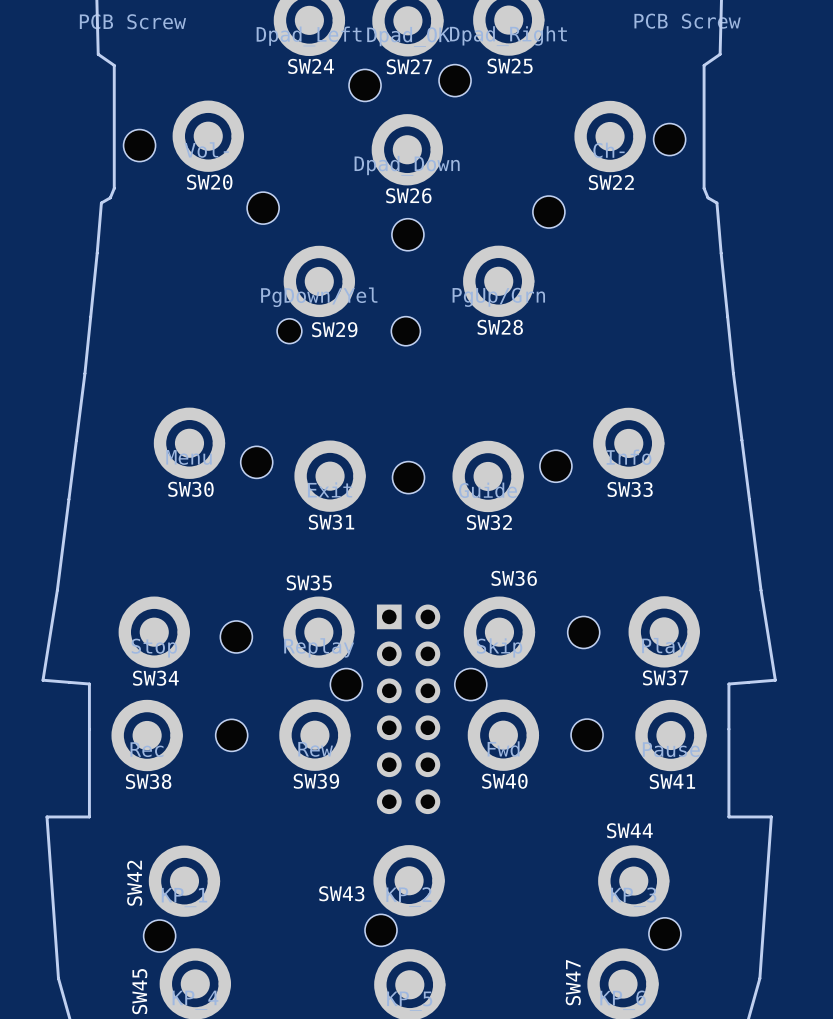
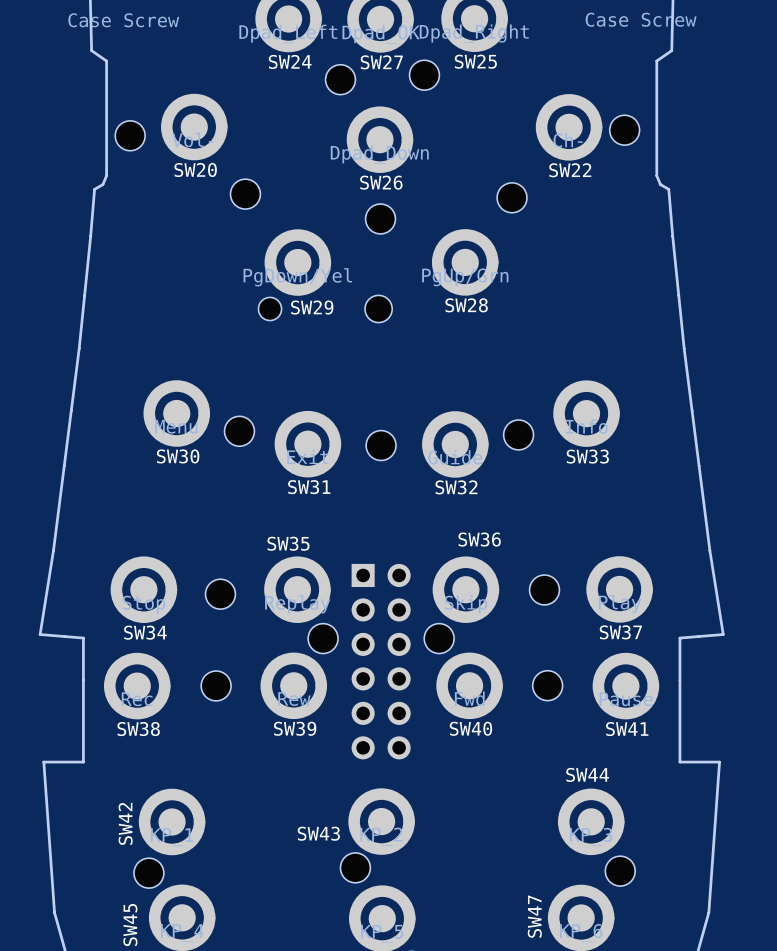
part value: PCB Screw (132, 21) -> Case Screw (123, 20)
part value: PCB Screw (687, 21) -> Case Screw (641, 19)

